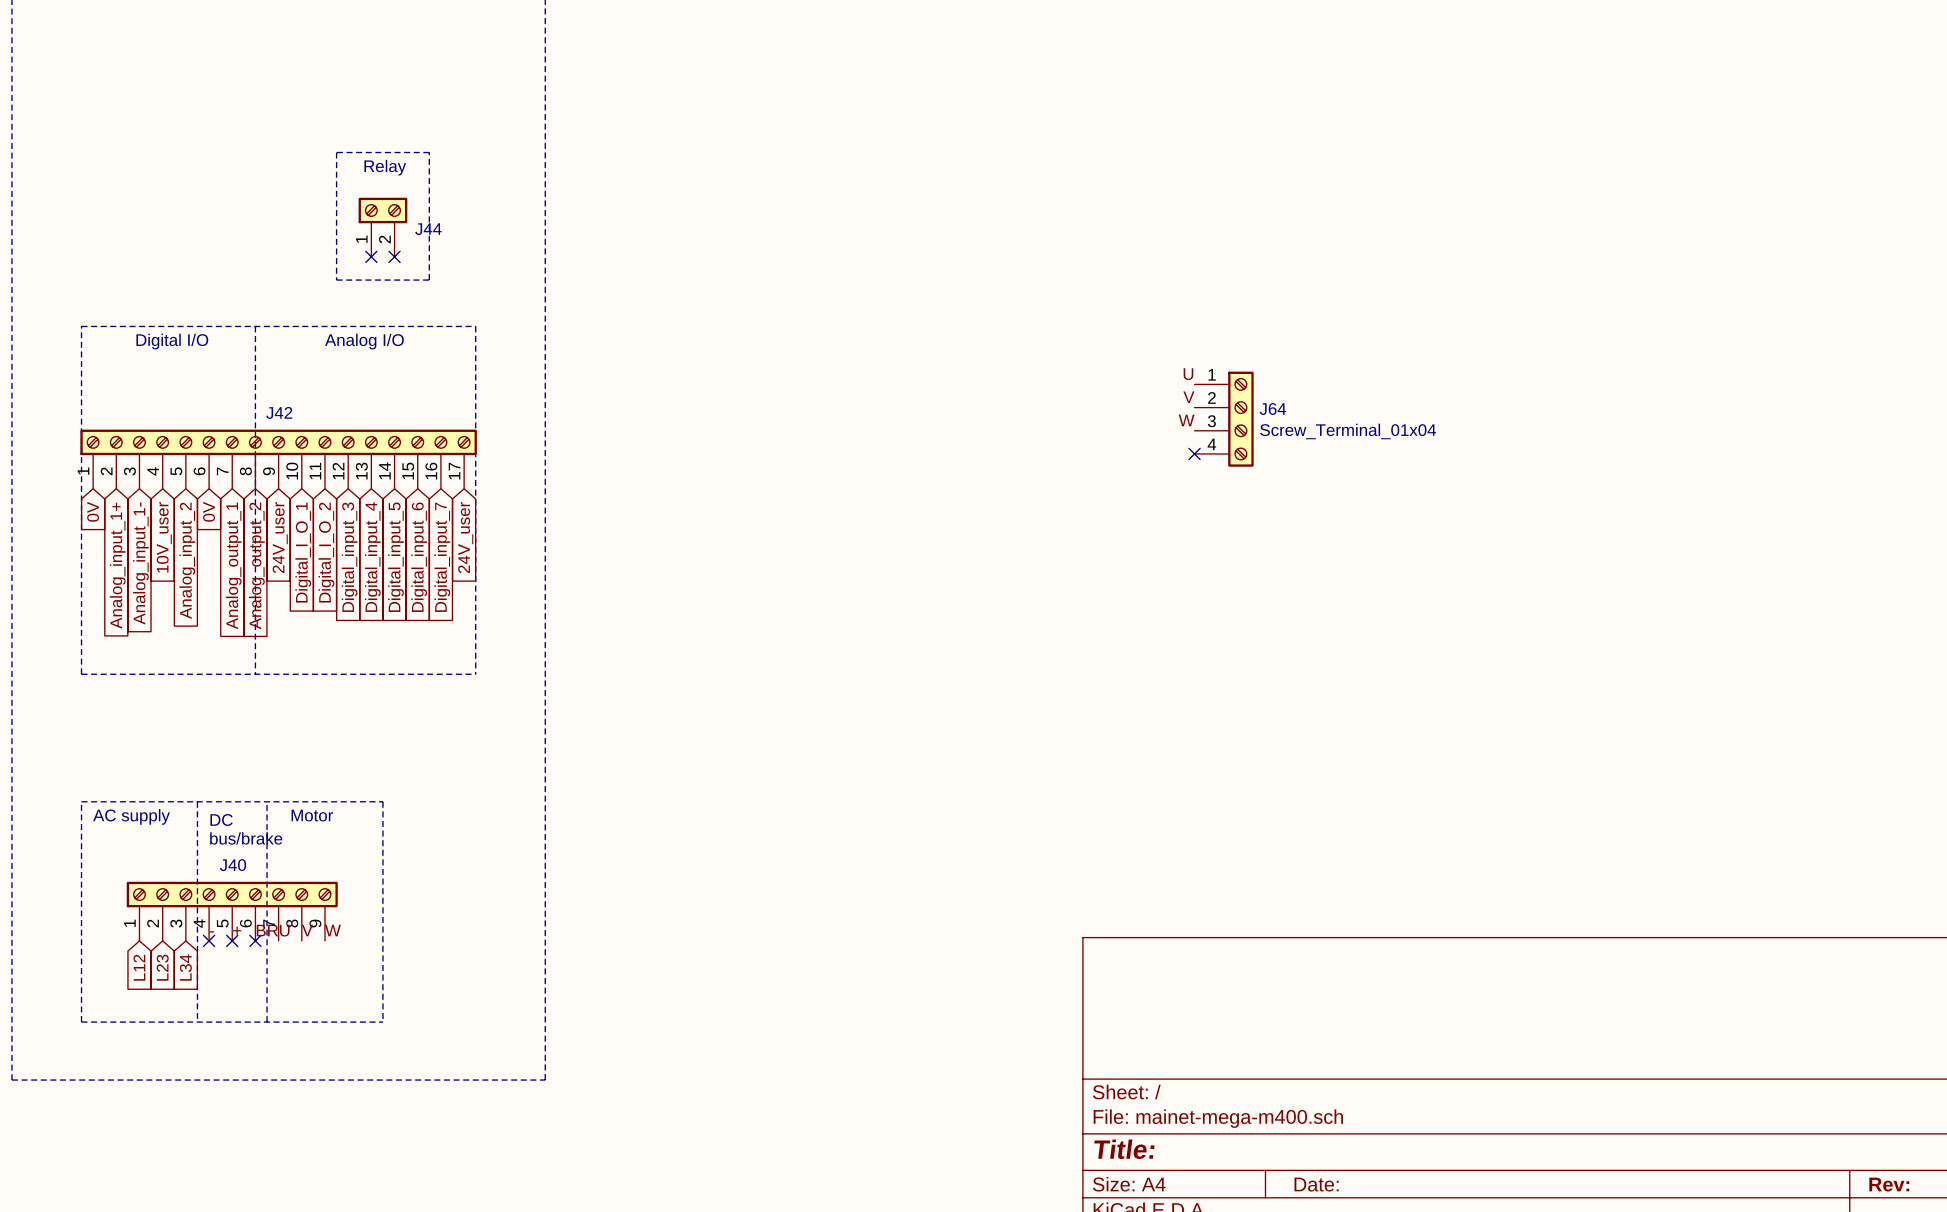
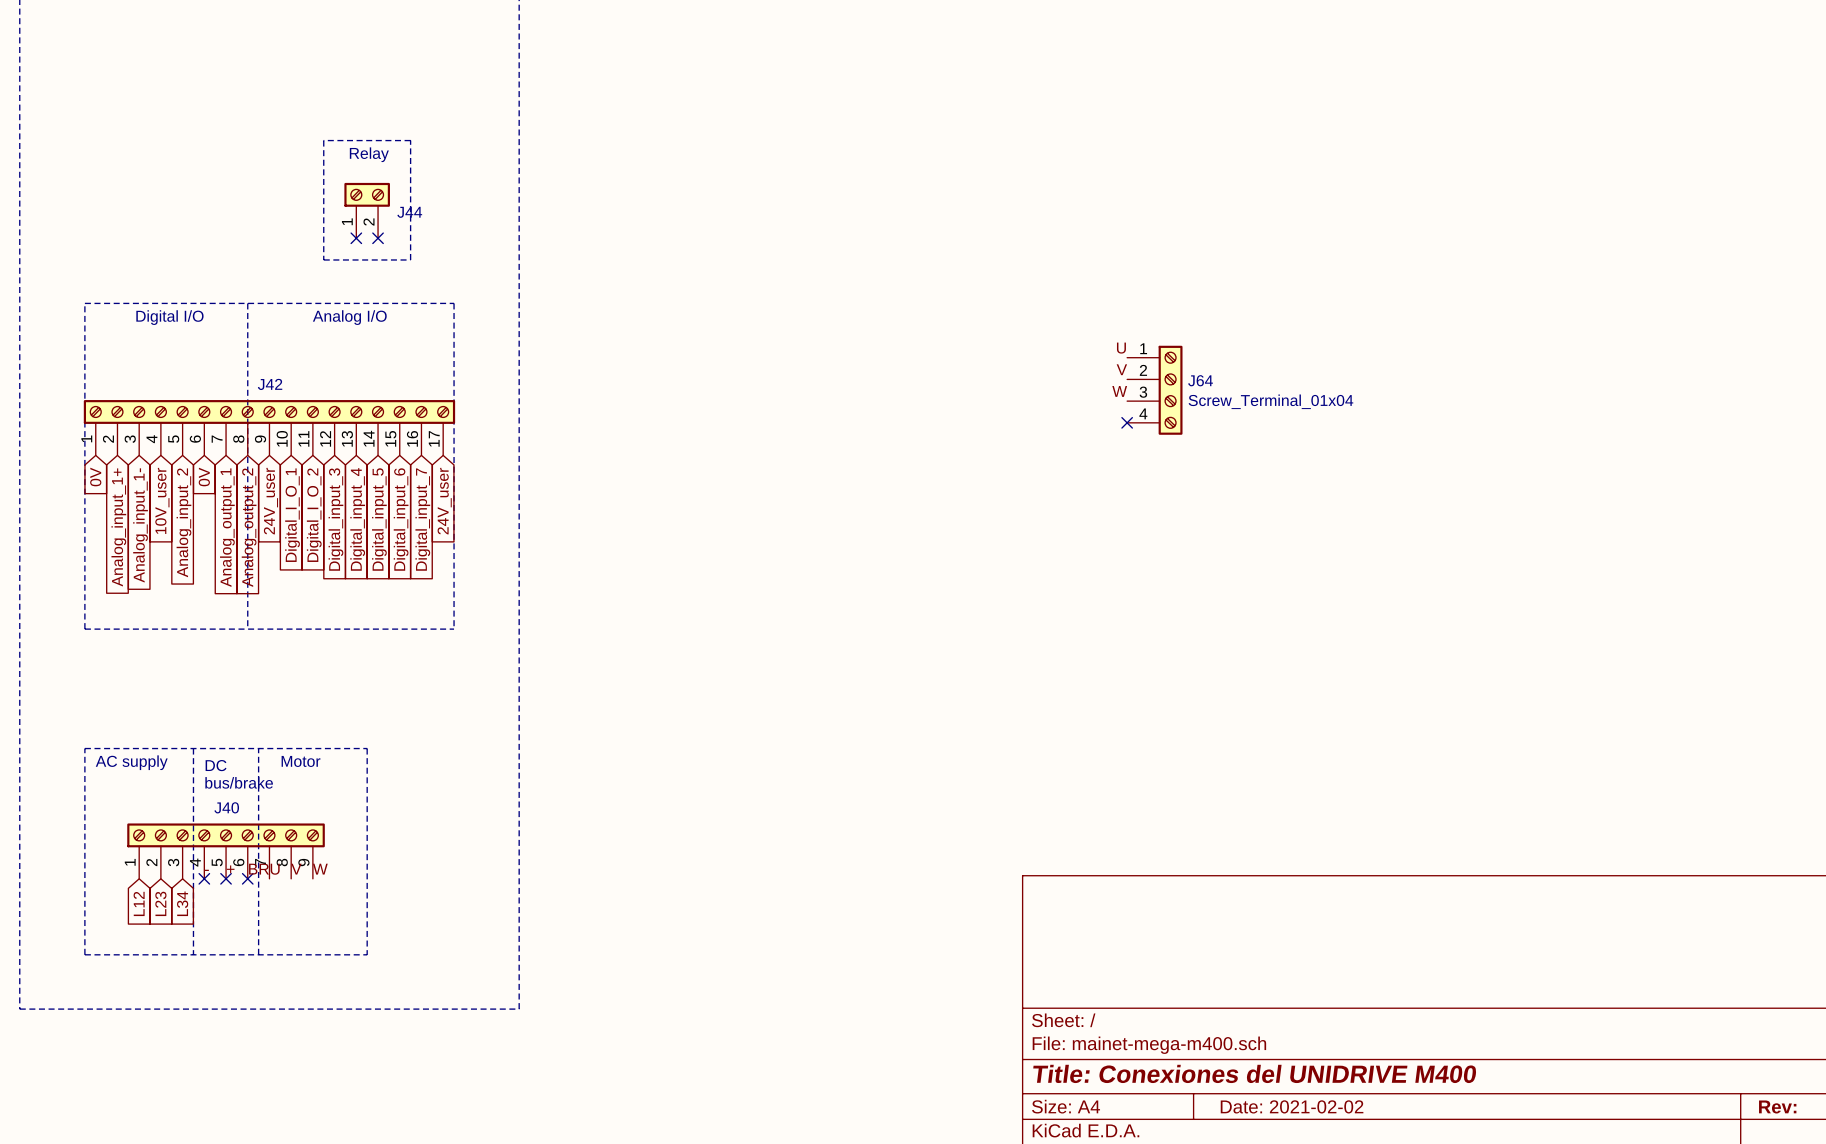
title block: Title: (1124, 1149) -> Title: Conexiones del UNIDRIVE M400 (1254, 1073)
title block: Date: (1316, 1184) -> Date: 2021-02-02 (1292, 1106)

